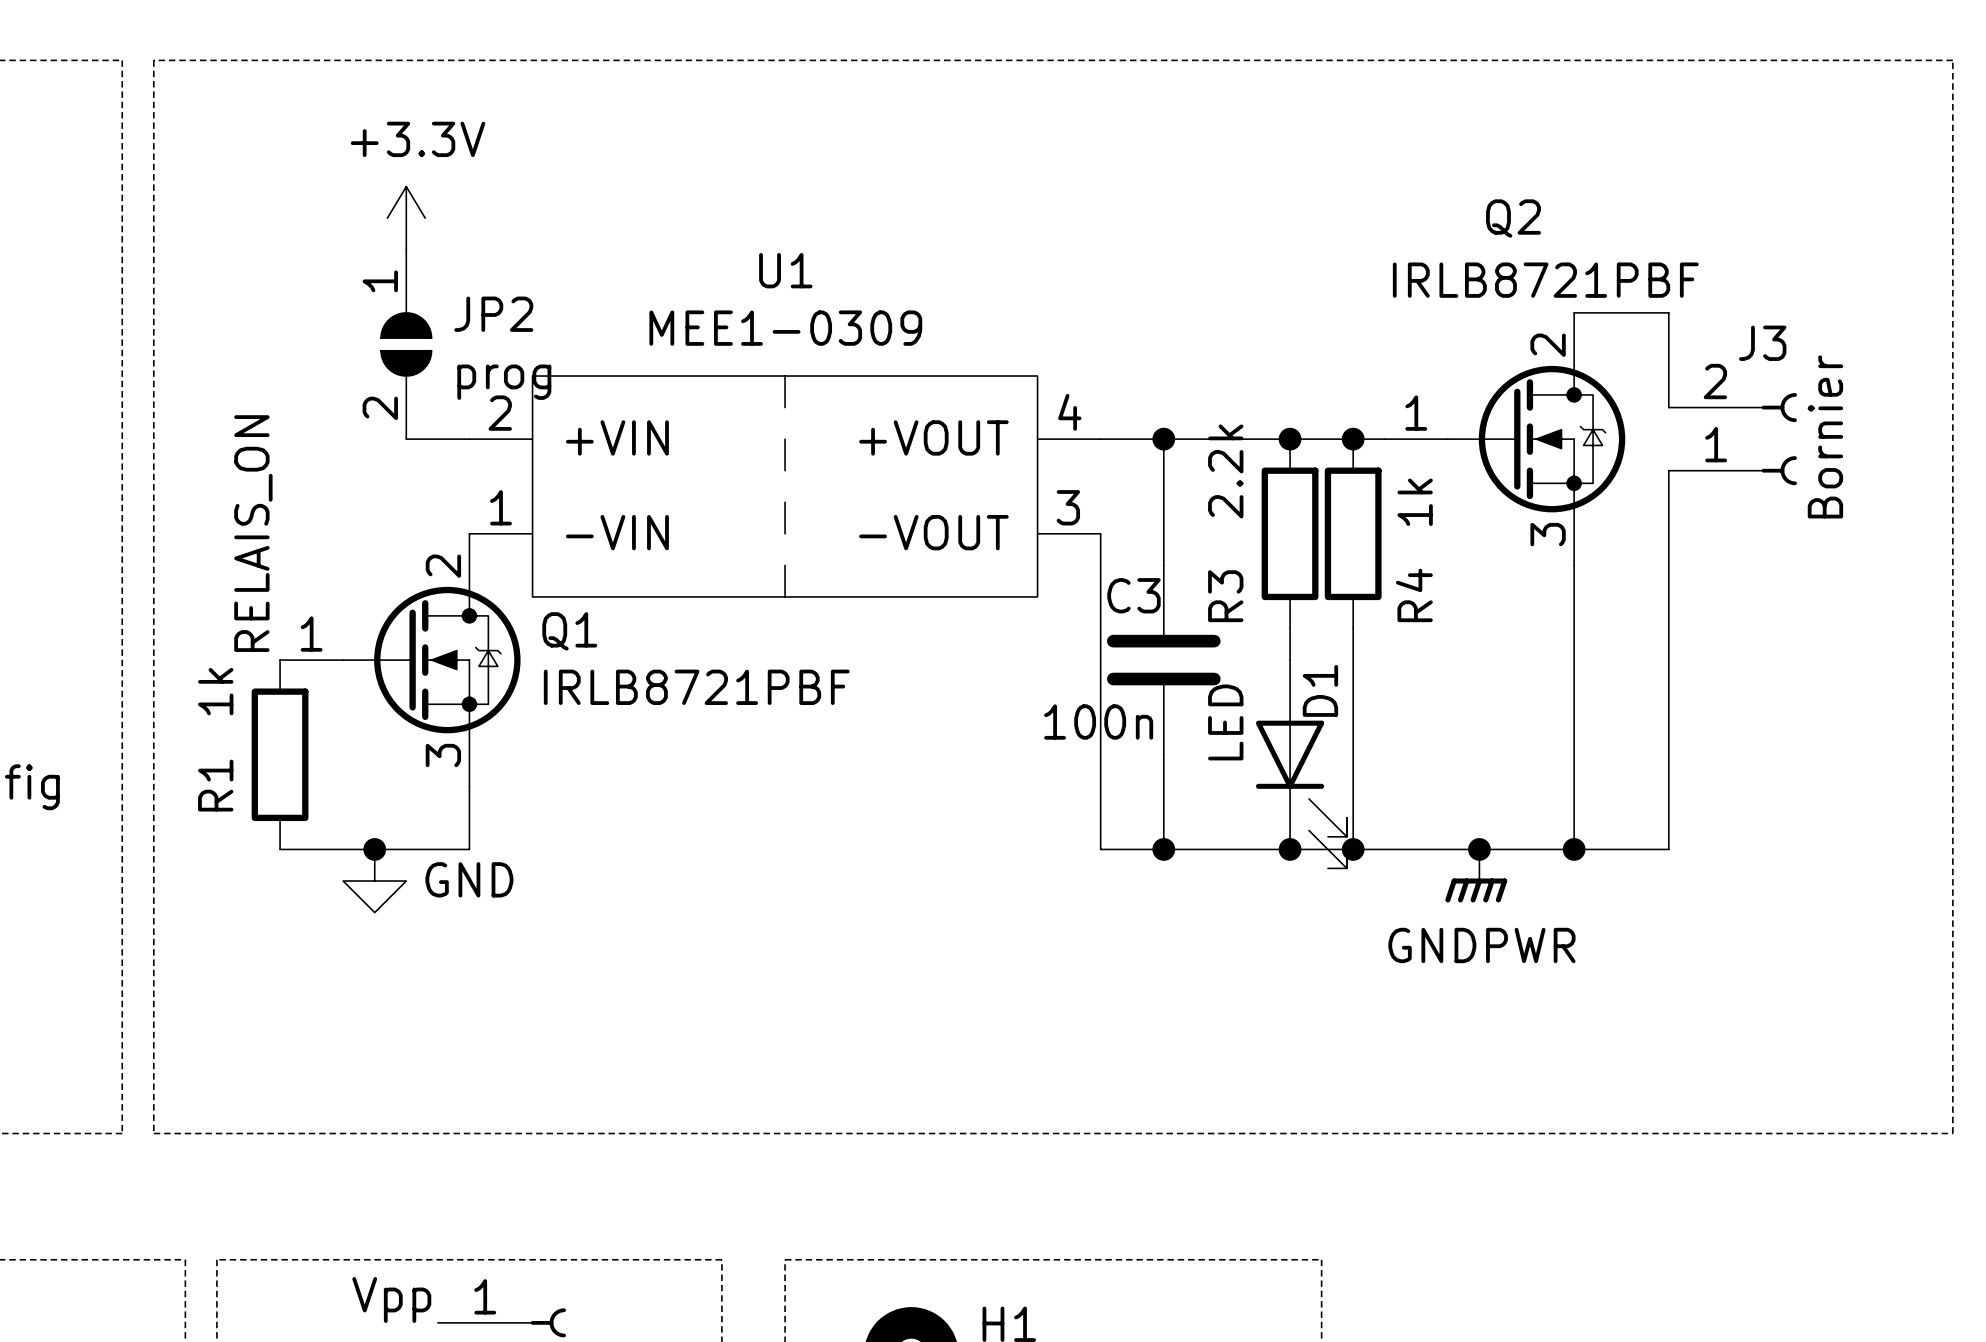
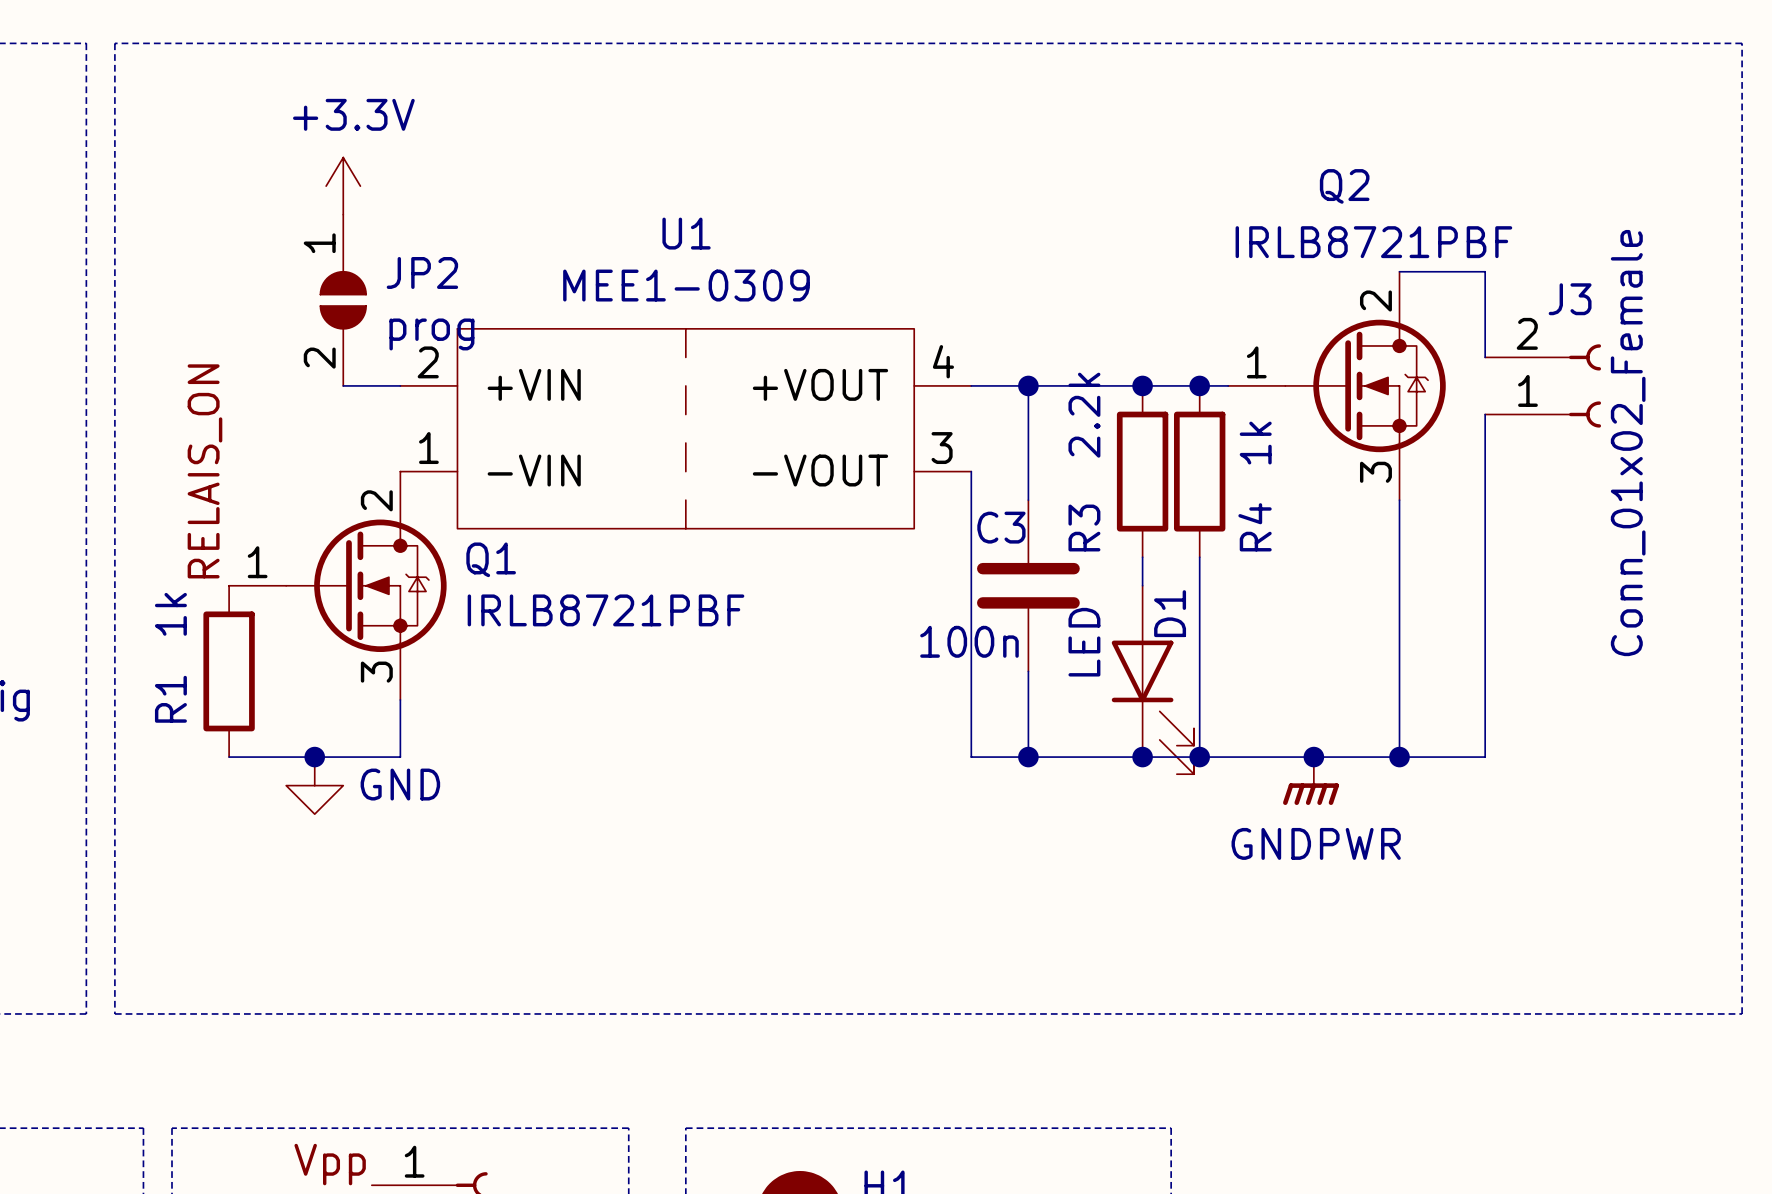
J3 value: Bornier (1825, 436) -> Conn_01x02_Female (1628, 443)

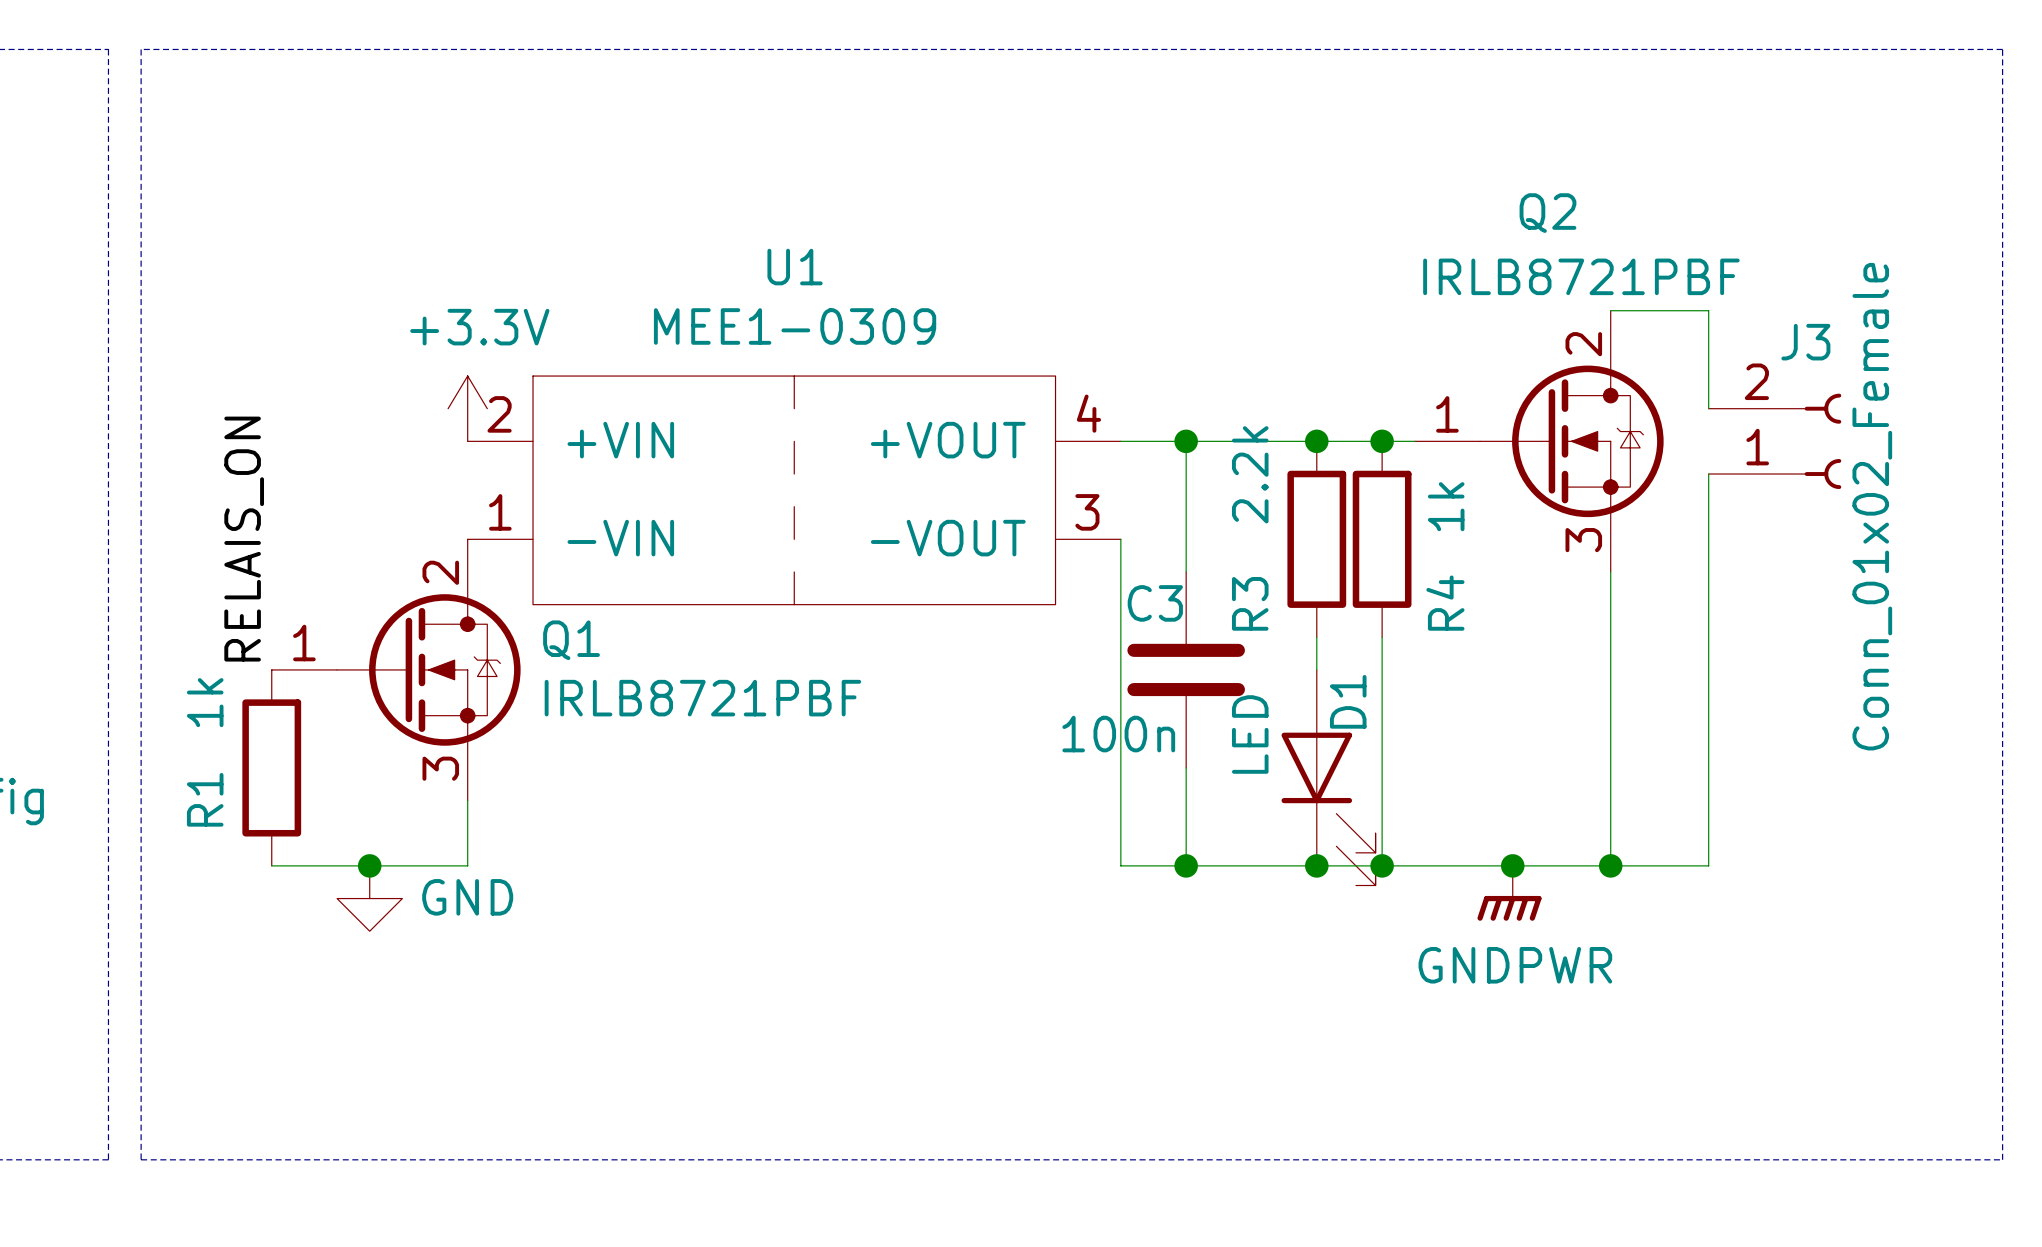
power symbol position: +3.3V (343, 186) -> +3.3V (467, 408)
JP2: prog (343, 300) -> none
wire: (343, 385) (400, 385) -> none

